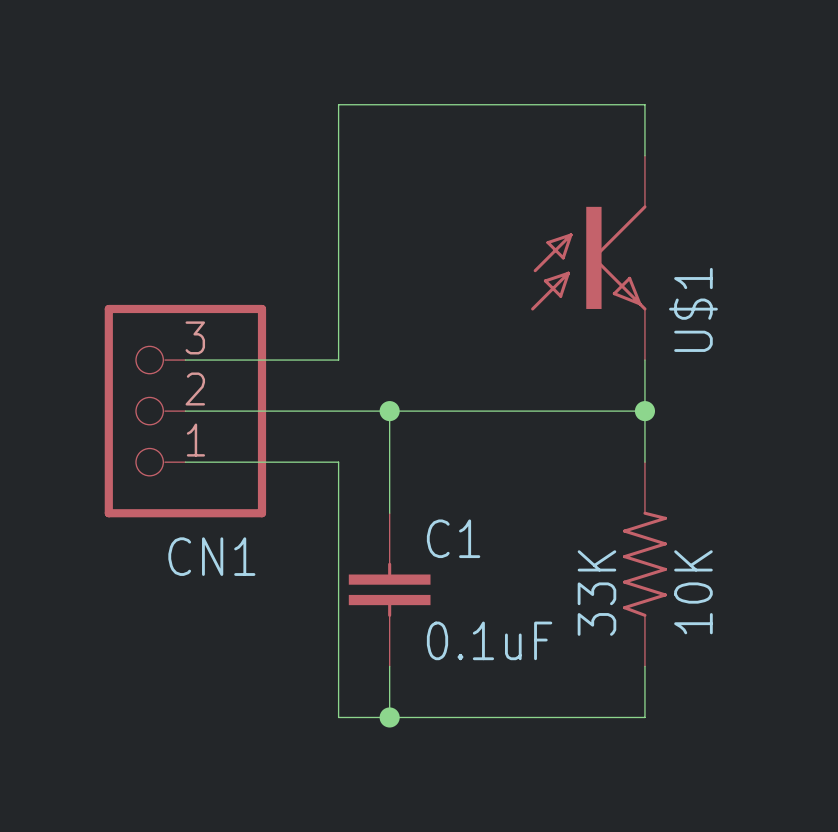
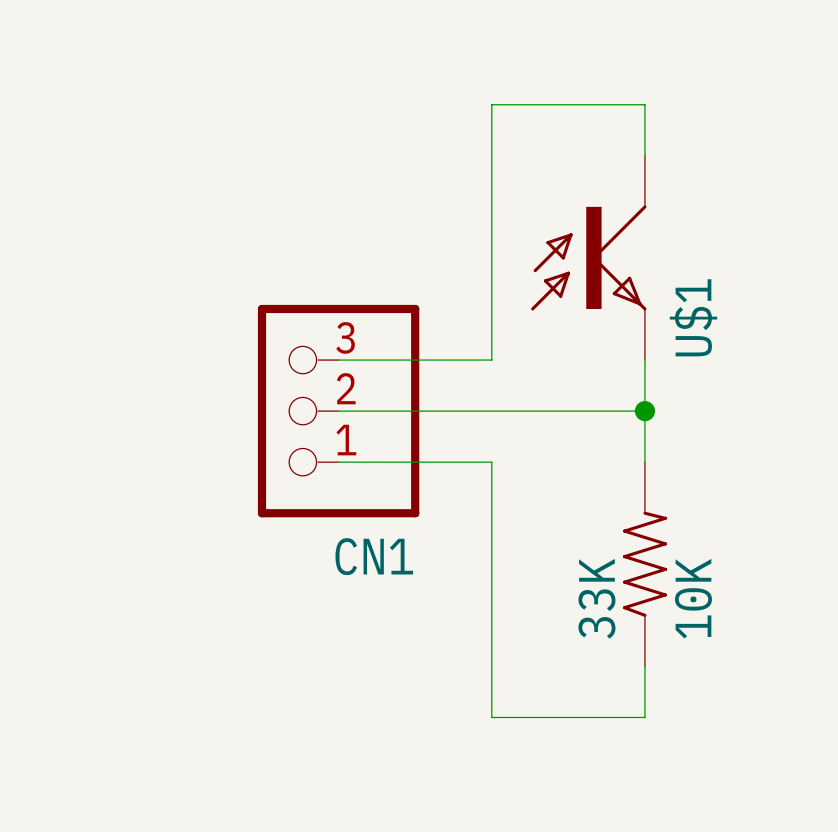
wire: (491, 104) (338, 104) (338, 360) (185, 360) -> (491, 104) (491, 360) (338, 360)
wire: (185, 411) (338, 411) -> none
CN1 position: (185, 411) -> (338, 411)
wire: (389, 411) (389, 513) -> none
junction: (389, 411) -> none
wire: (185, 462) (338, 462) (338, 717) (491, 717) -> (338, 462) (491, 462) (491, 717)
C1: 0.1uF (389, 589) -> none
wire: (389, 666) (389, 717) -> none
junction: (389, 717) -> none

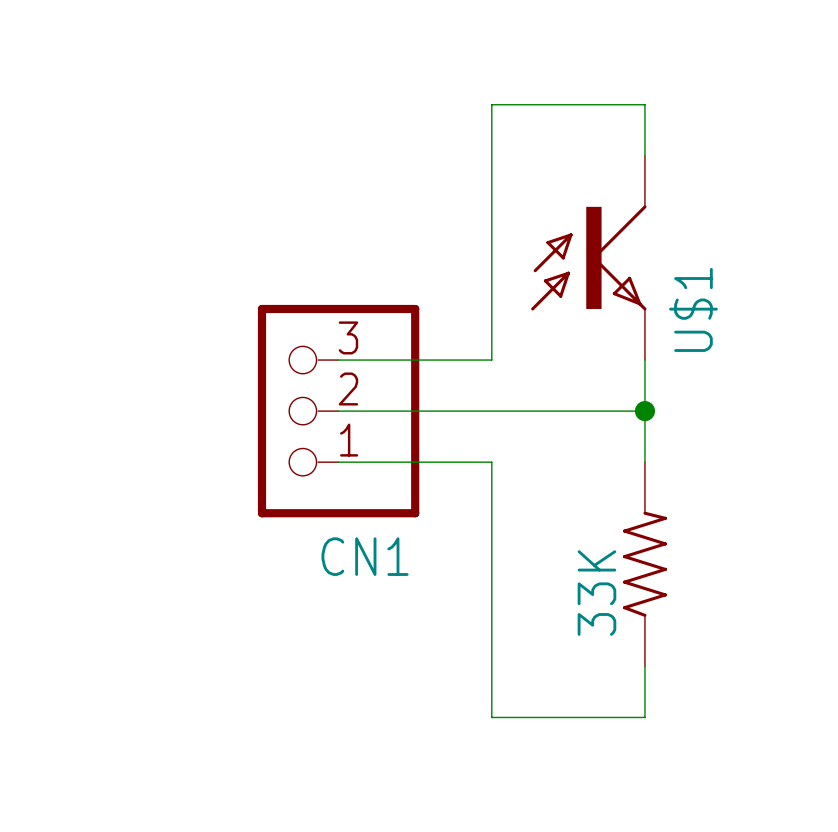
33K value: 10K (693, 598) -> none

